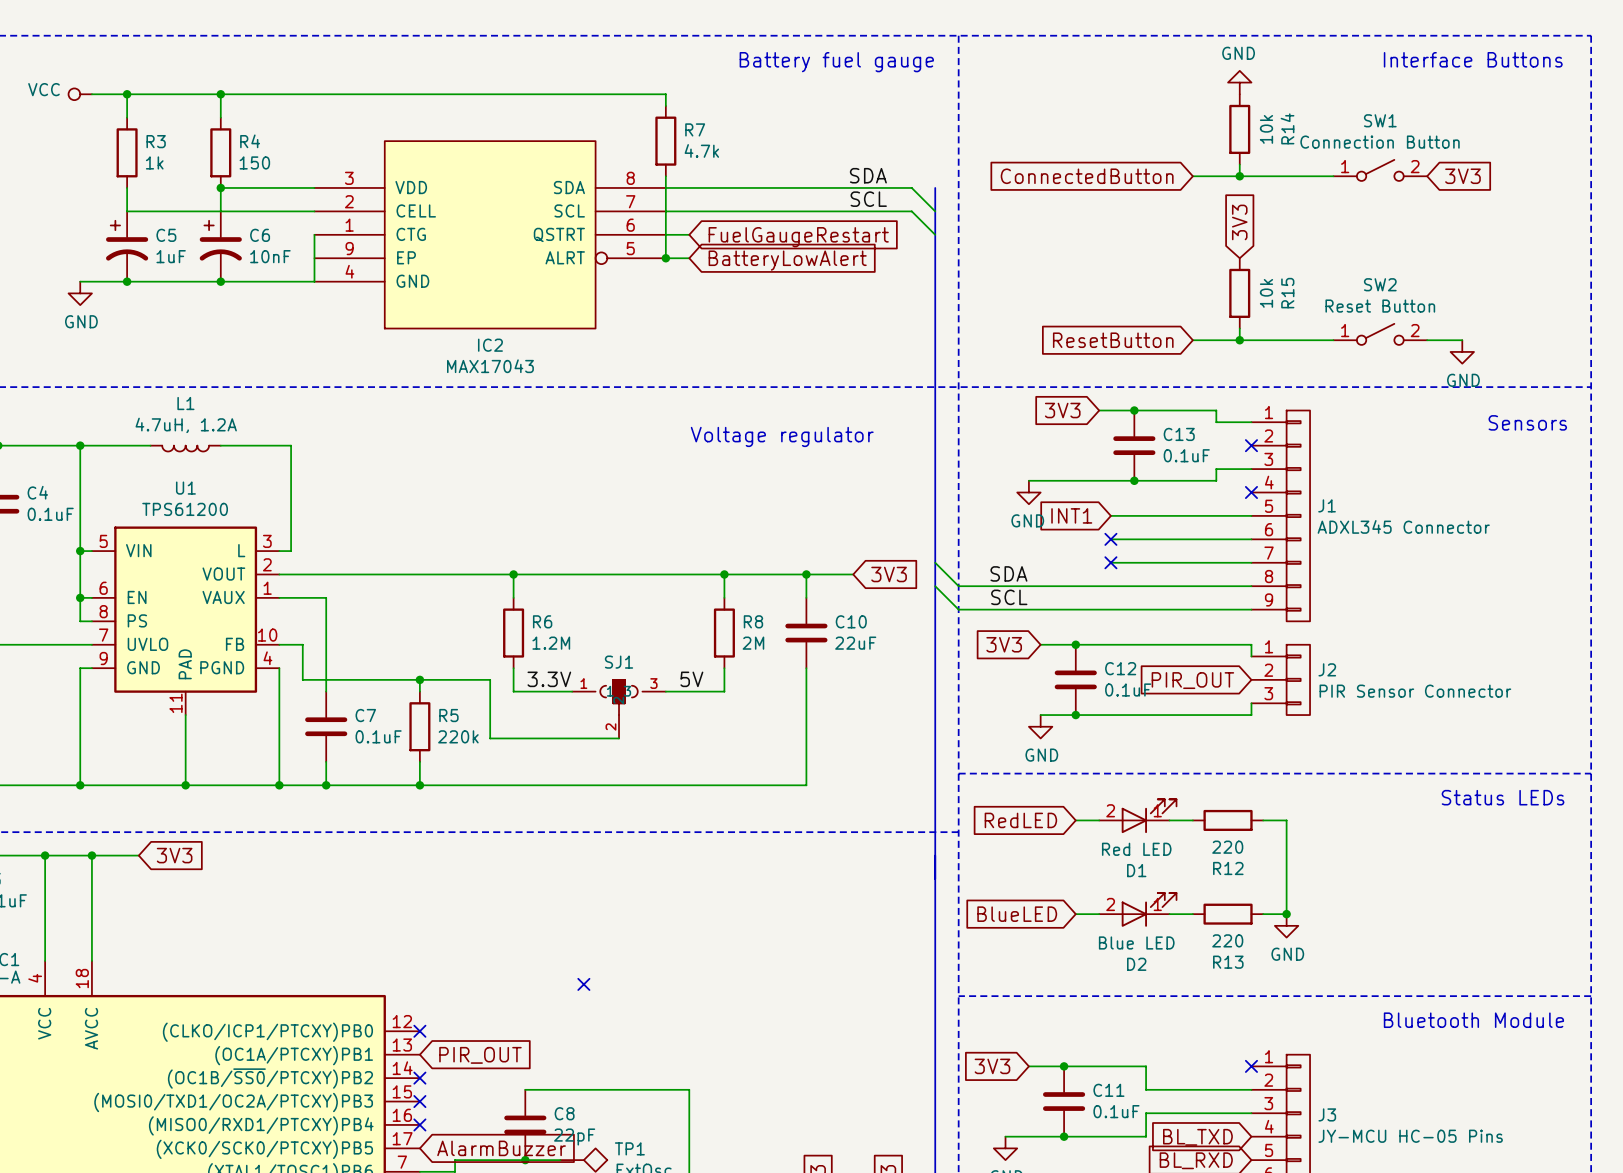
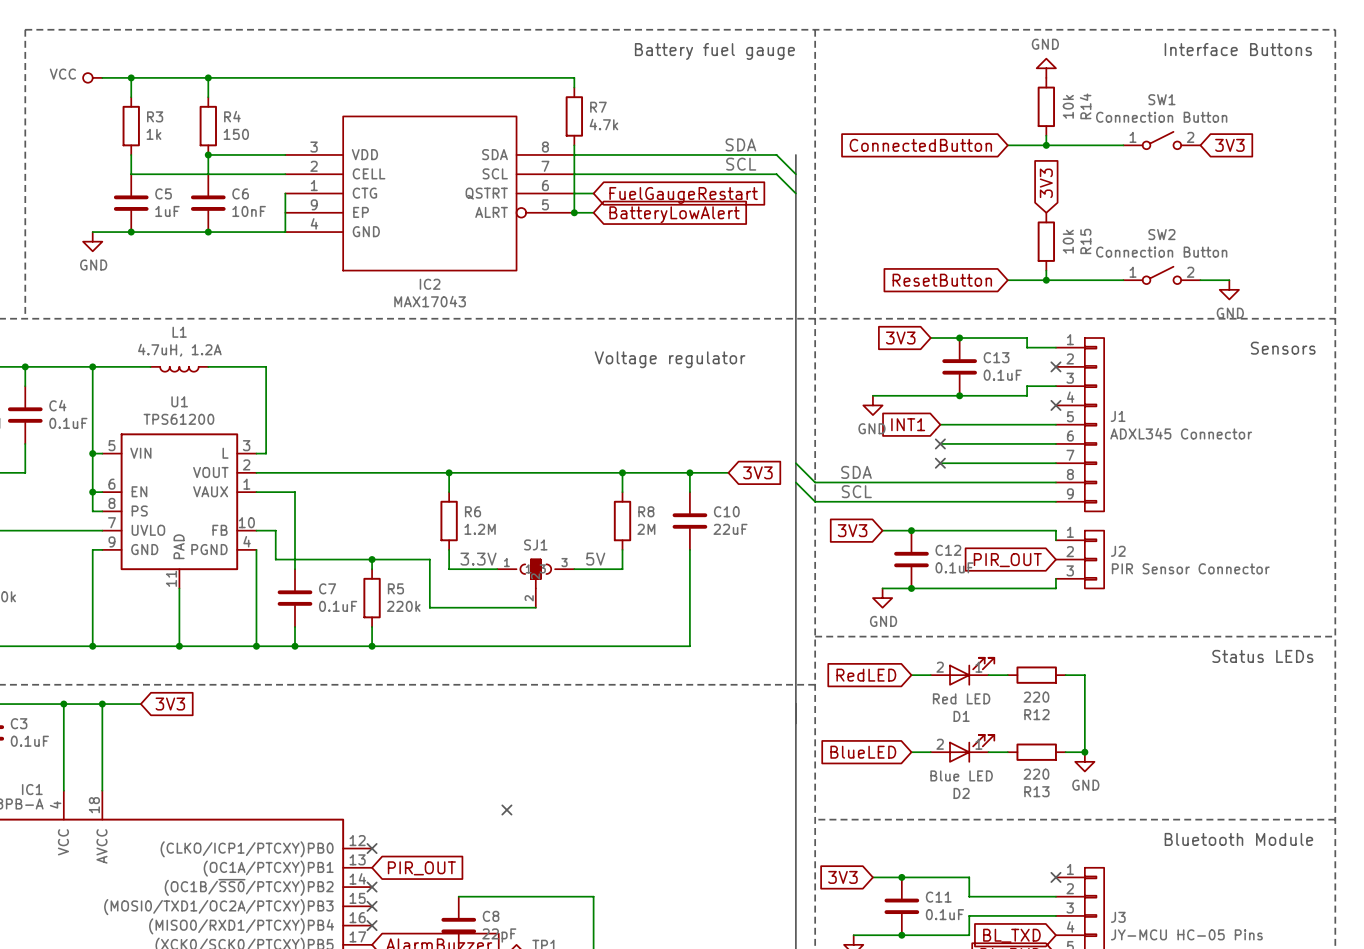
C5 symbol: [106, 211, 149, 282] -> [113, 174, 149, 233]
C6 symbol: [199, 211, 242, 282] -> [190, 174, 226, 233]
SW2 value: Reset Button (1380, 306) -> Connection Button (1161, 252)

